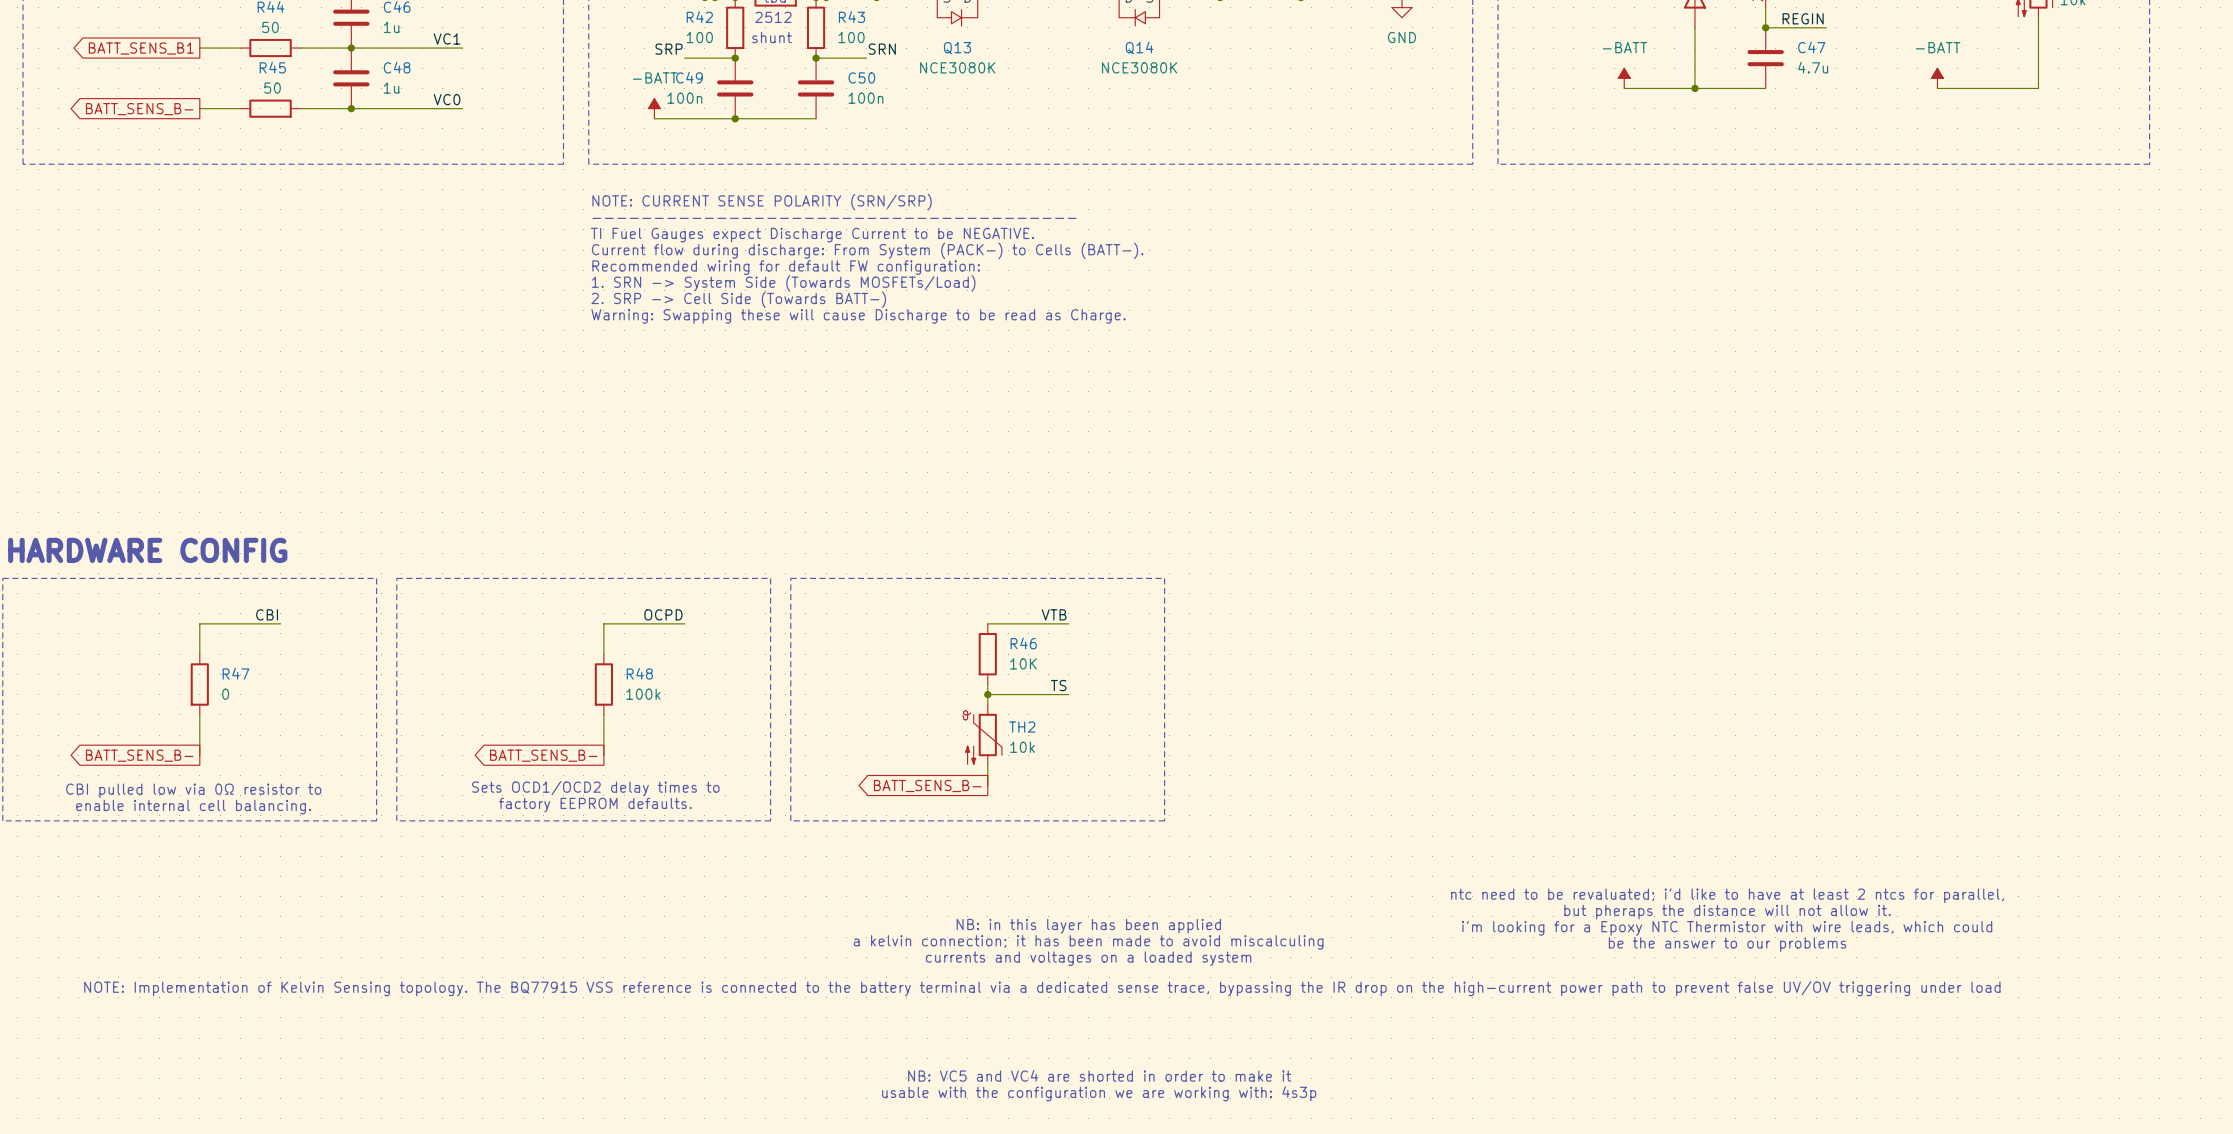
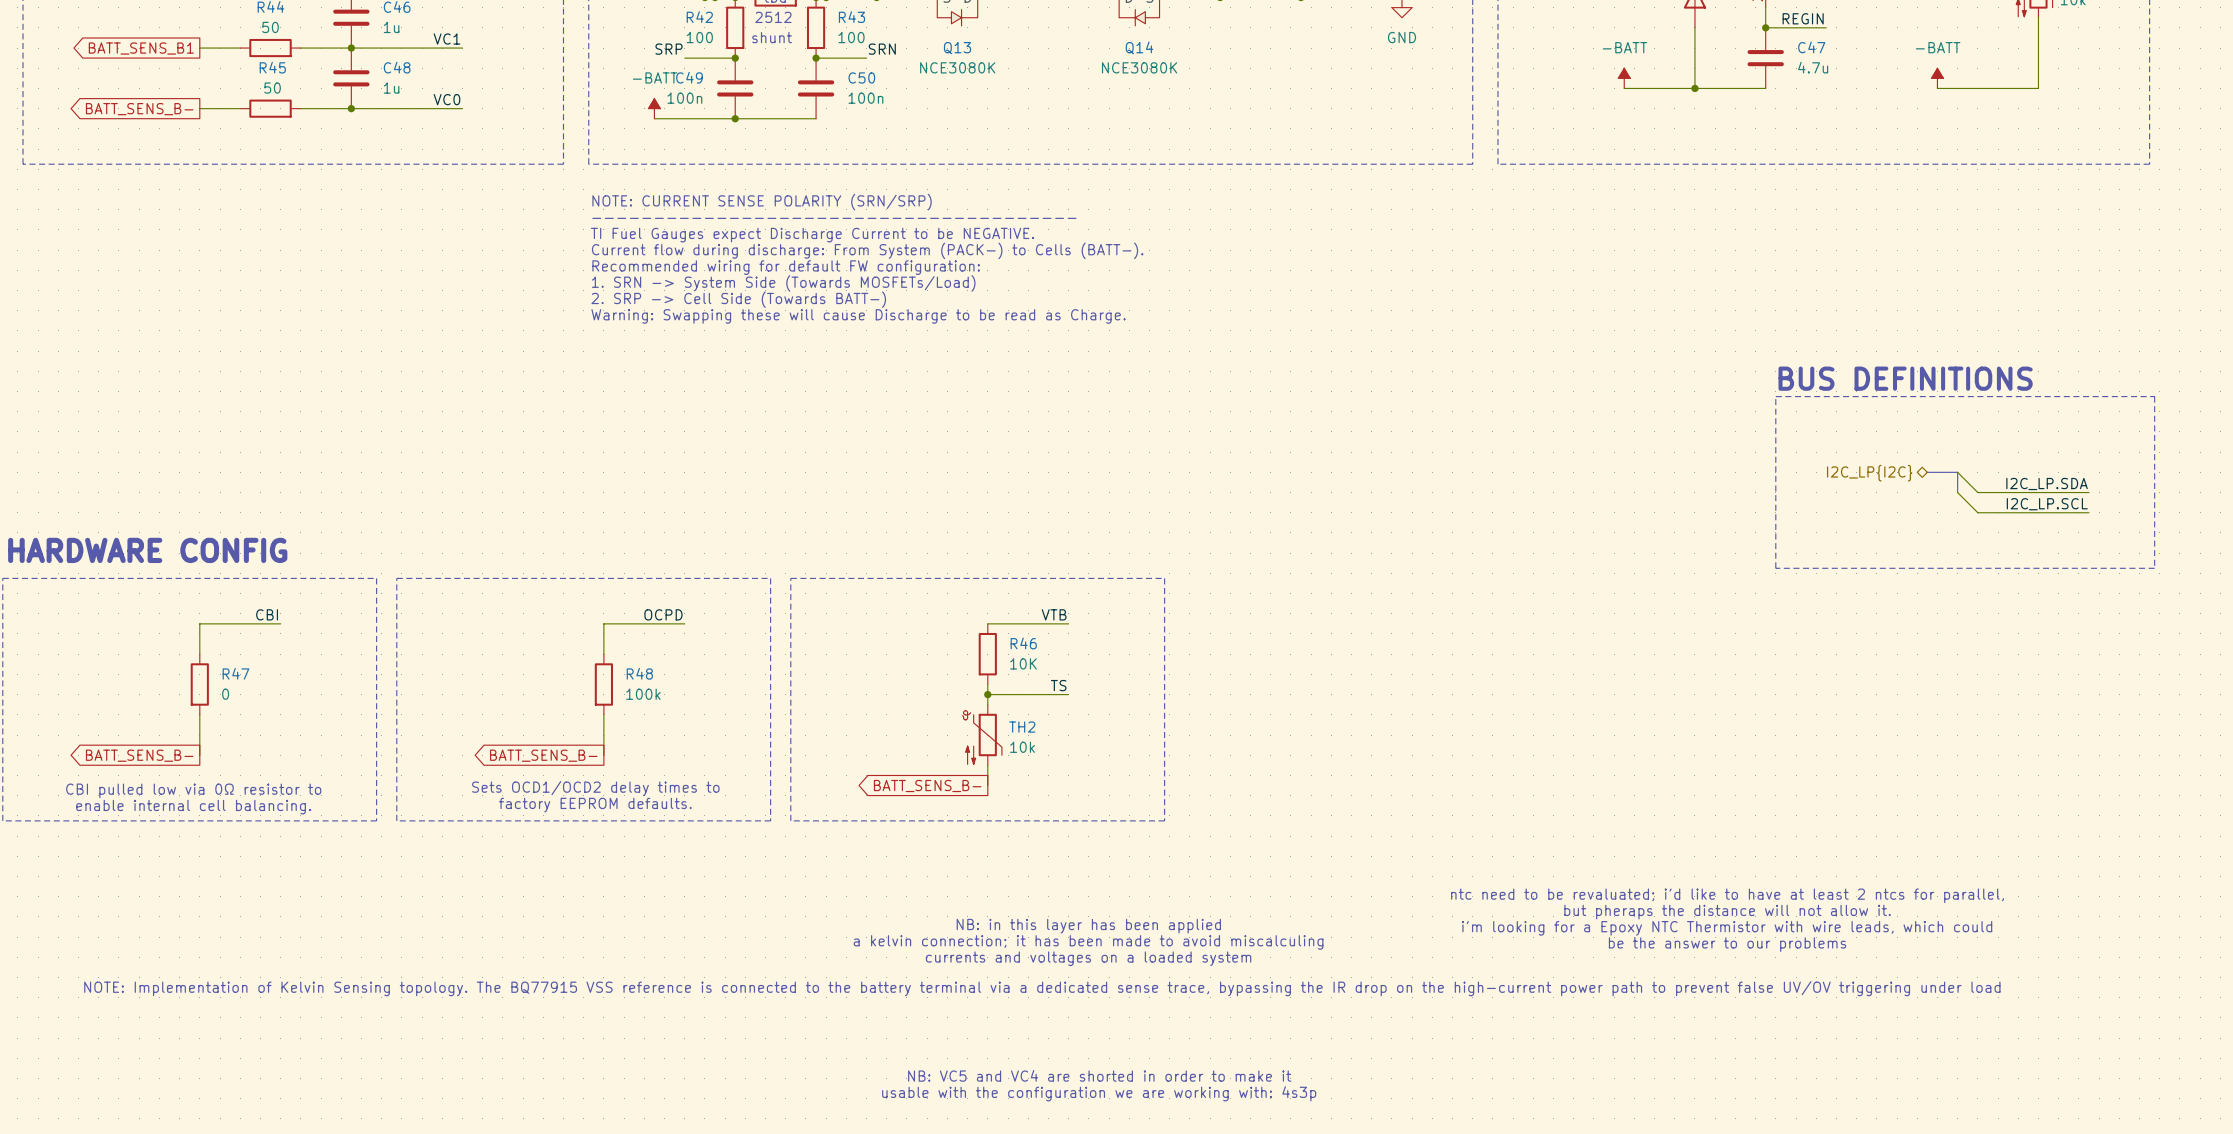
text: none -> BUS DEFINITIONS (1905, 378)
line: none -> (1775, 396) (2154, 396) (2154, 568) (1775, 568) (1775, 396)
bus: none -> (1927, 472) (1957, 472) (1957, 492)
wire: none -> (1957, 472) (1977, 492) (2088, 492)
hierarchical label: none -> I2C_LP{I2C} (1869, 473)
label: none -> I2C_LP.SDA (2047, 484)
wire: none -> (1957, 492) (1977, 512) (2088, 512)
label: none -> I2C_LP.SCL (2047, 504)

